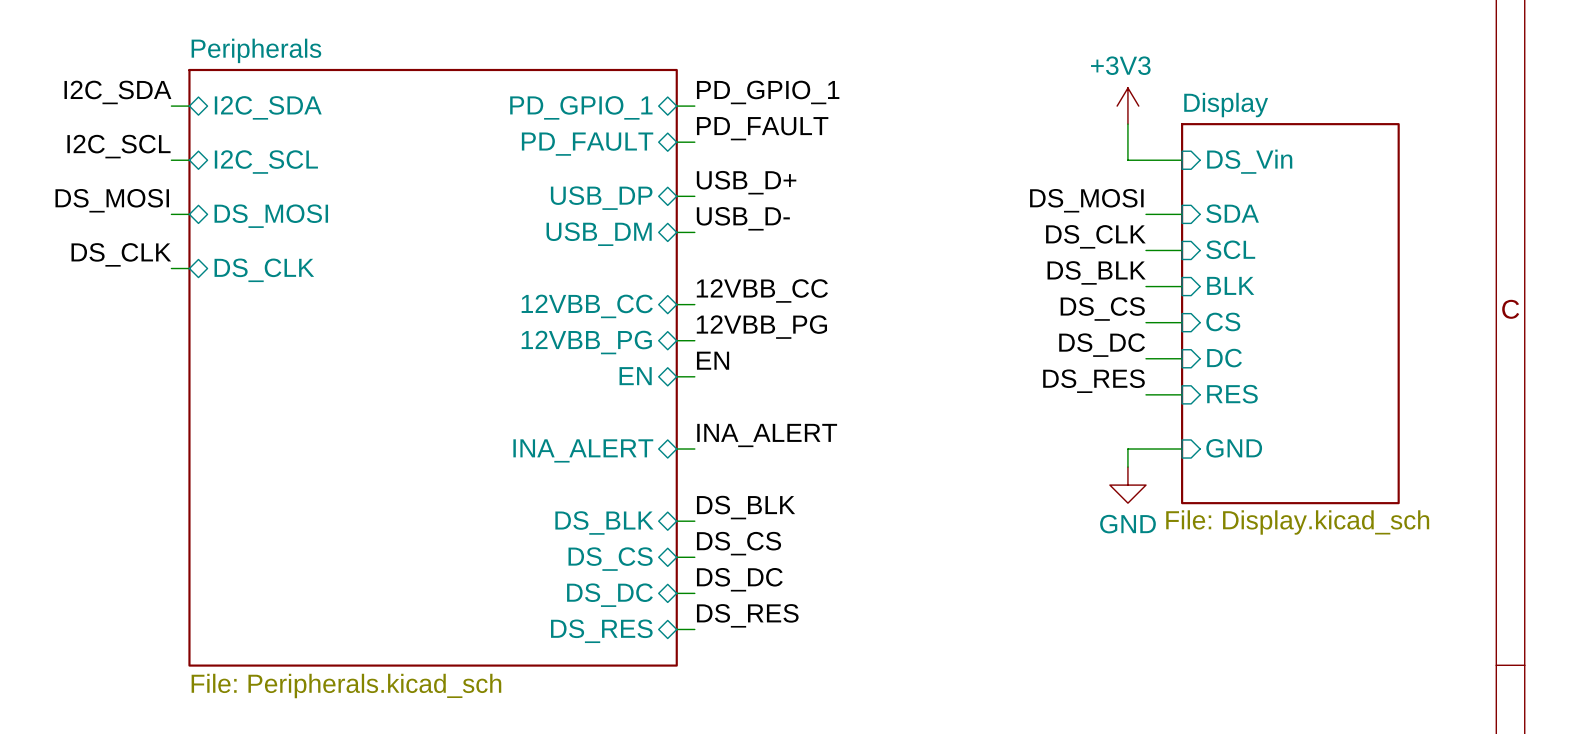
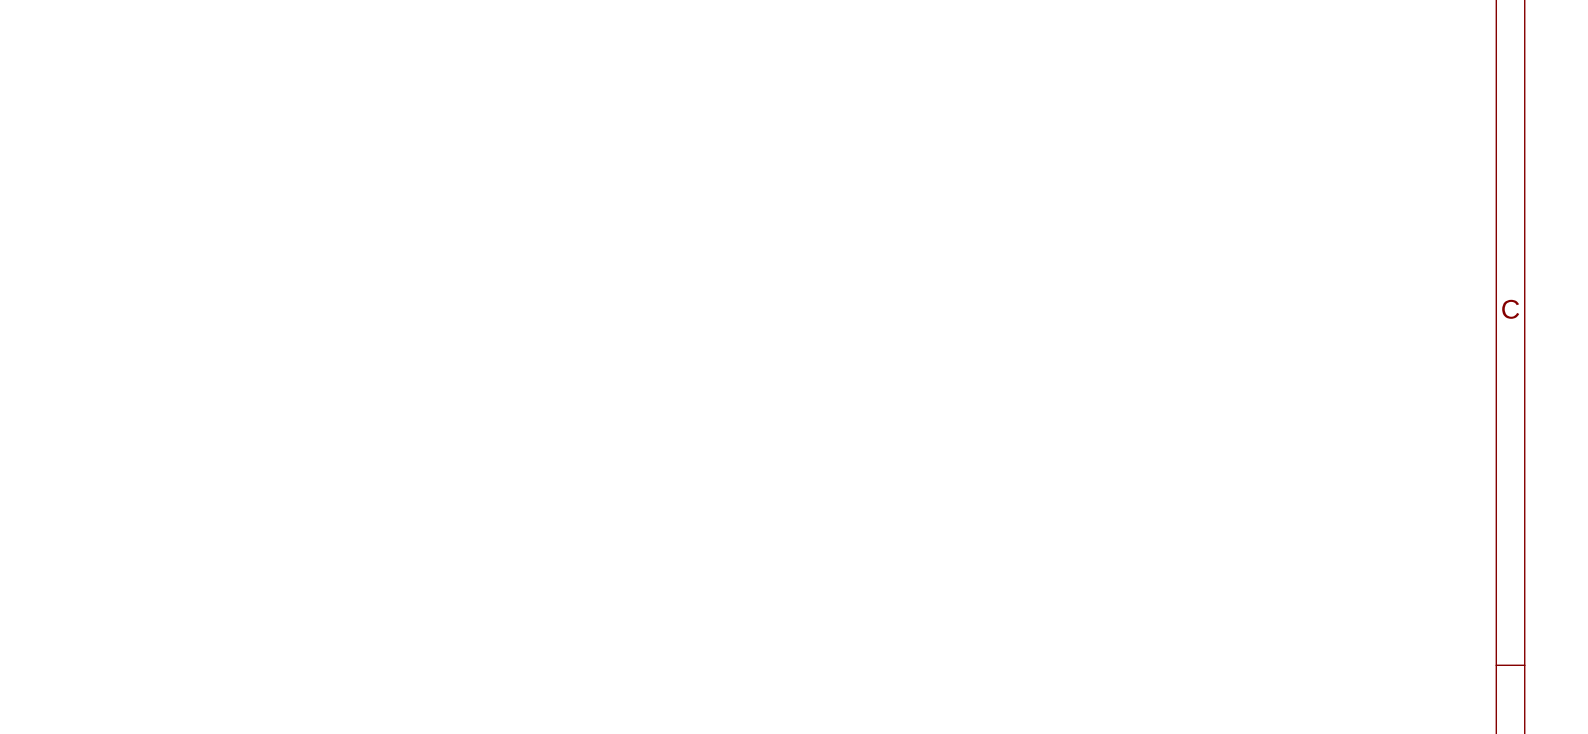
label: I2C_SDA (117, 92) -> none
label: PD_GPIO_1 (768, 92) -> none
wire: (171, 106) (189, 106) -> none
wire: (676, 106) (694, 106) -> none
power symbol: +3V3 (1127, 106) -> none
sheet pin: I2C_SDA (268, 107) -> none
sheet pin: PD_GPIO_1 (581, 107) -> none
wire: (1127, 124) (1127, 160) (1182, 160) -> none
label: PD_FAULT (762, 128) -> none
wire: (676, 142) (694, 142) -> none
sheet pin: PD_FAULT (587, 144) -> none
label: I2C_SCL (118, 146) -> none
wire: (171, 160) (189, 160) -> none
sheet pin: DS_Vin (1249, 161) -> none
sheet pin: I2C_SCL (266, 162) -> none
label: USB_D+ (746, 182) -> none
wire: (676, 196) (694, 196) -> none
sheet pin: USB_DP (601, 198) -> none
label: DS_MOSI (112, 200) -> none
label: DS_MOSI (1086, 200) -> none
sheet pin: SDA (1232, 213) -> none
wire: (171, 214) (189, 214) -> none
wire: (1146, 214) (1182, 214) -> none
sheet pin: DS_MOSI (271, 216) -> none
label: USB_D- (743, 218) -> none
wire: (676, 232) (694, 232) -> none
sheet pin: USB_DM (599, 234) -> none
label: DS_CLK (1095, 236) -> none
sheet pin: SCL (1230, 249) -> none
wire: (1146, 250) (1182, 250) -> none
label: DS_CLK (121, 254) -> none
wire: (171, 268) (189, 268) -> none
sheet pin: DS_CLK (264, 270) -> none
label: DS_BLK (1096, 272) -> none
sheet pin: BLK (1230, 285) -> none
wire: (1146, 286) (1182, 286) -> none
label: 12VBB_CC (762, 290) -> none
wire: (676, 304) (694, 304) -> none
sheet pin: 12VBB_CC (587, 306) -> none
label: DS_CS (1102, 309) -> none
sheet Display: File: Display.kicad_sch (1290, 313) -> none
sheet pin: CS (1223, 321) -> none
wire: (1146, 322) (1182, 322) -> none
label: 12VBB_PG (761, 327) -> none
wire: (676, 340) (694, 340) -> none
sheet pin: 12VBB_PG (586, 342) -> none
label: DS_DC (1102, 345) -> none
wire: (1146, 358) (1182, 358) -> none
sheet pin: DC (1224, 358) -> none
label: EN (713, 360) -> none
sheet Peripherals: File: Peripherals.kicad_sch (433, 367) -> none
sheet pin: EN (635, 376) -> none
wire: (676, 376) (694, 376) -> none
label: DS_RES (1093, 381) -> none
wire: (1146, 394) (1182, 394) -> none
sheet pin: RES (1232, 394) -> none
label: INA_ALERT (767, 435) -> none
sheet pin: GND (1234, 448) -> none
wire: (676, 449) (694, 449) -> none
wire: (1182, 449) (1127, 449) (1127, 467) -> none
sheet pin: INA_ALERT (583, 450) -> none
power symbol: GND (1127, 485) -> none
label: DS_BLK (746, 507) -> none
wire: (676, 521) (694, 521) -> none
sheet pin: DS_BLK (604, 522) -> none
label: DS_CS (739, 543) -> none
wire: (676, 557) (694, 557) -> none
sheet pin: DS_CS (610, 559) -> none
label: DS_DC (739, 579) -> none
wire: (676, 593) (694, 593) -> none
sheet pin: DS_DC (609, 595) -> none
label: DS_RES (747, 615) -> none
wire: (676, 629) (694, 629) -> none
sheet pin: DS_RES (601, 631) -> none

